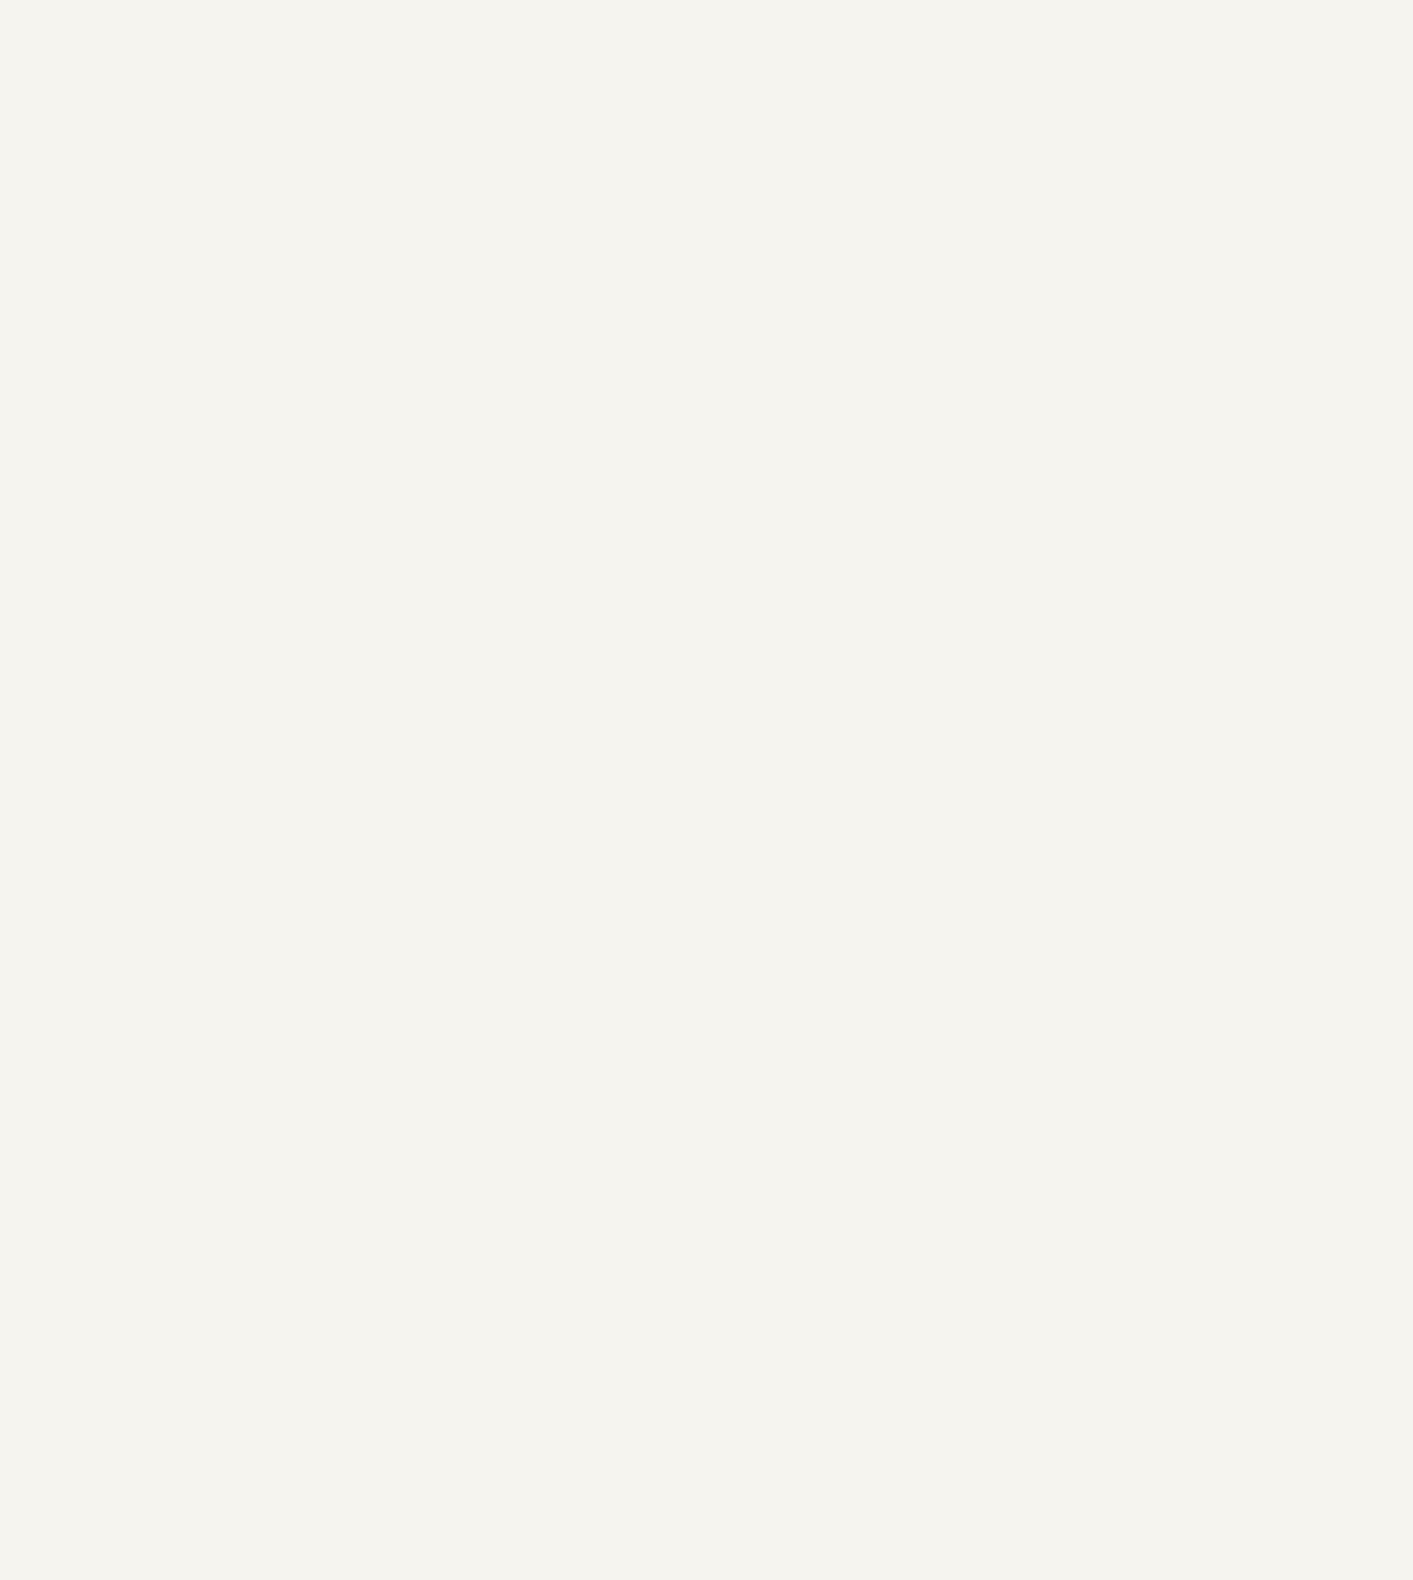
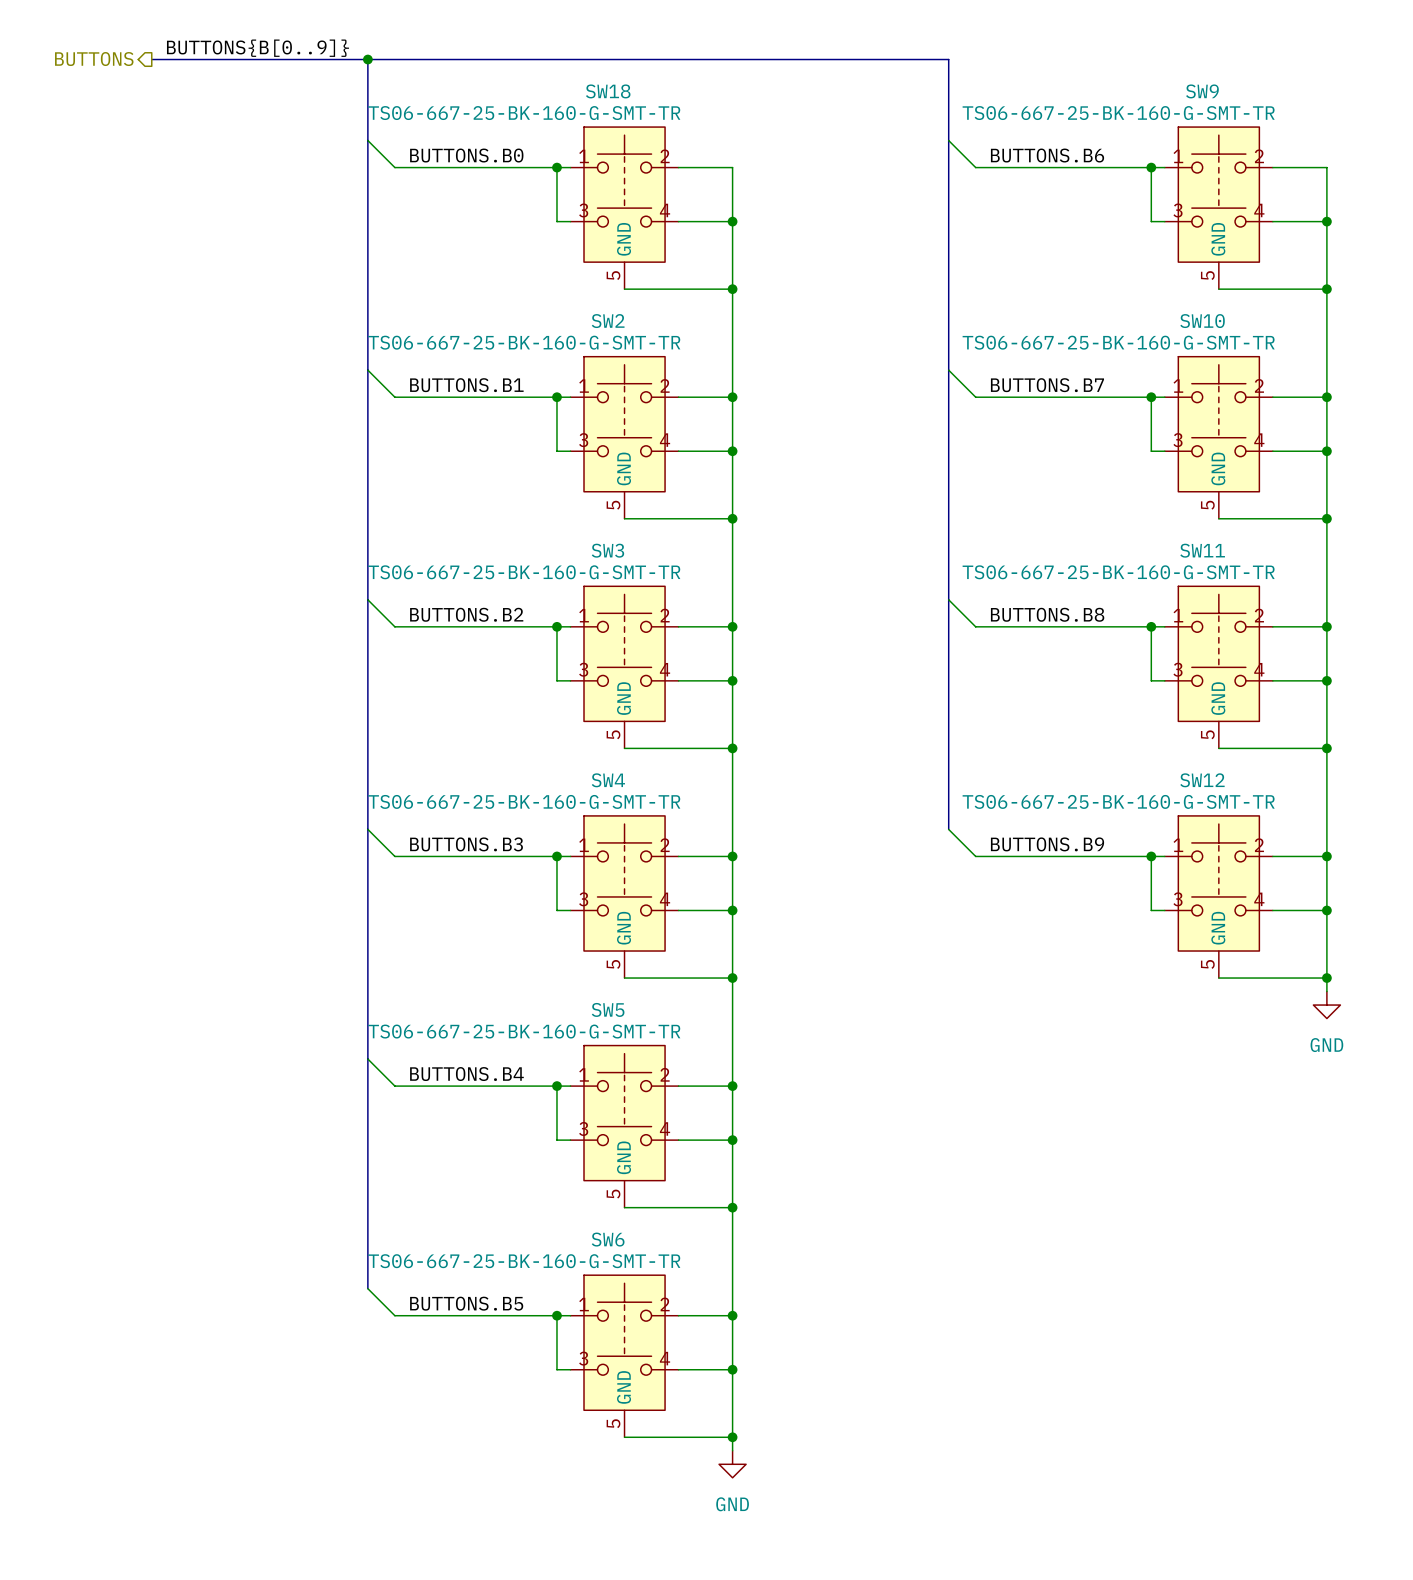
label: none -> BUTTONS{B[0..9]} (258, 48)
hierarchical label: none -> BUTTONS (94, 59)
bus: none -> (151, 59) (948, 59) (948, 829)
bus: none -> (367, 59) (367, 1288)
junction: none -> (367, 59)
wire: none -> (367, 140) (394, 167) (570, 167)
wire: none -> (948, 140) (975, 167) (1164, 167)
label: none -> BUTTONS.B0 (466, 155)
label: none -> BUTTONS.B6 (1047, 155)
wire: none -> (556, 167) (556, 221) (570, 221)
junction: none -> (556, 167)
wire: none -> (678, 167) (732, 167) (732, 1450)
wire: none -> (1151, 167) (1151, 221) (1164, 221)
junction: none -> (1151, 167)
wire: none -> (1272, 167) (1326, 167) (1326, 991)
SW18: none -> TS06-667-25-BK-160-G-SMT-TR (624, 208)
SW9: none -> TS06-667-25-BK-160-G-SMT-TR (1218, 208)
wire: none -> (678, 221) (732, 221)
junction: none -> (732, 221)
wire: none -> (1272, 221) (1326, 221)
junction: none -> (1326, 221)
wire: none -> (624, 289) (732, 289)
junction: none -> (732, 289)
wire: none -> (1218, 289) (1326, 289)
junction: none -> (1326, 289)
wire: none -> (367, 370) (394, 397) (570, 397)
wire: none -> (948, 370) (975, 397) (1164, 397)
label: none -> BUTTONS.B1 (466, 385)
label: none -> BUTTONS.B7 (1047, 385)
wire: none -> (556, 397) (556, 451) (570, 451)
junction: none -> (556, 397)
wire: none -> (678, 397) (732, 397)
junction: none -> (732, 397)
wire: none -> (1151, 397) (1151, 451) (1164, 451)
junction: none -> (1151, 397)
wire: none -> (1272, 397) (1326, 397)
junction: none -> (1326, 397)
SW2: none -> TS06-667-25-BK-160-G-SMT-TR (624, 437)
SW10: none -> TS06-667-25-BK-160-G-SMT-TR (1218, 437)
wire: none -> (678, 451) (732, 451)
junction: none -> (732, 451)
wire: none -> (1272, 451) (1326, 451)
junction: none -> (1326, 451)
wire: none -> (624, 518) (732, 518)
junction: none -> (732, 518)
wire: none -> (1218, 518) (1326, 518)
junction: none -> (1326, 518)
wire: none -> (367, 599) (394, 626) (570, 626)
wire: none -> (948, 599) (975, 626) (1164, 626)
label: none -> BUTTONS.B2 (466, 614)
label: none -> BUTTONS.B8 (1047, 614)
wire: none -> (556, 626) (556, 680) (570, 680)
junction: none -> (556, 626)
wire: none -> (678, 626) (732, 626)
junction: none -> (732, 626)
wire: none -> (1151, 626) (1151, 680) (1164, 680)
junction: none -> (1151, 626)
wire: none -> (1272, 626) (1326, 626)
junction: none -> (1326, 626)
SW3: none -> TS06-667-25-BK-160-G-SMT-TR (624, 667)
SW11: none -> TS06-667-25-BK-160-G-SMT-TR (1218, 667)
wire: none -> (678, 680) (732, 680)
junction: none -> (732, 680)
wire: none -> (1272, 680) (1326, 680)
junction: none -> (1326, 680)
wire: none -> (624, 748) (732, 748)
junction: none -> (732, 748)
wire: none -> (1218, 748) (1326, 748)
junction: none -> (1326, 748)
wire: none -> (367, 829) (394, 856) (570, 856)
wire: none -> (948, 829) (975, 856) (1164, 856)
label: none -> BUTTONS.B3 (466, 844)
label: none -> BUTTONS.B9 (1047, 844)
wire: none -> (556, 856) (556, 910) (570, 910)
junction: none -> (556, 856)
wire: none -> (678, 856) (732, 856)
junction: none -> (732, 856)
wire: none -> (1151, 856) (1151, 910) (1164, 910)
junction: none -> (1151, 856)
wire: none -> (1272, 856) (1326, 856)
junction: none -> (1326, 856)
SW4: none -> TS06-667-25-BK-160-G-SMT-TR (624, 896)
SW12: none -> TS06-667-25-BK-160-G-SMT-TR (1218, 896)
wire: none -> (678, 910) (732, 910)
junction: none -> (732, 910)
wire: none -> (1272, 910) (1326, 910)
junction: none -> (1326, 910)
wire: none -> (624, 978) (732, 978)
junction: none -> (732, 978)
wire: none -> (1218, 978) (1326, 978)
junction: none -> (1326, 978)
power symbol: none -> GND (1326, 1005)
wire: none -> (367, 1059) (394, 1086) (570, 1086)
label: none -> BUTTONS.B4 (466, 1074)
wire: none -> (556, 1086) (556, 1140) (570, 1140)
junction: none -> (556, 1086)
wire: none -> (678, 1086) (732, 1086)
junction: none -> (732, 1086)
SW5: none -> TS06-667-25-BK-160-G-SMT-TR (624, 1126)
wire: none -> (678, 1140) (732, 1140)
junction: none -> (732, 1140)
wire: none -> (624, 1207) (732, 1207)
junction: none -> (732, 1207)
wire: none -> (367, 1288) (394, 1315) (570, 1315)
label: none -> BUTTONS.B5 (466, 1303)
wire: none -> (556, 1315) (556, 1369) (570, 1369)
junction: none -> (556, 1315)
wire: none -> (678, 1315) (732, 1315)
junction: none -> (732, 1315)
SW6: none -> TS06-667-25-BK-160-G-SMT-TR (624, 1356)
wire: none -> (678, 1369) (732, 1369)
junction: none -> (732, 1369)
wire: none -> (624, 1437) (732, 1437)
junction: none -> (732, 1437)
power symbol: none -> GND (732, 1464)

